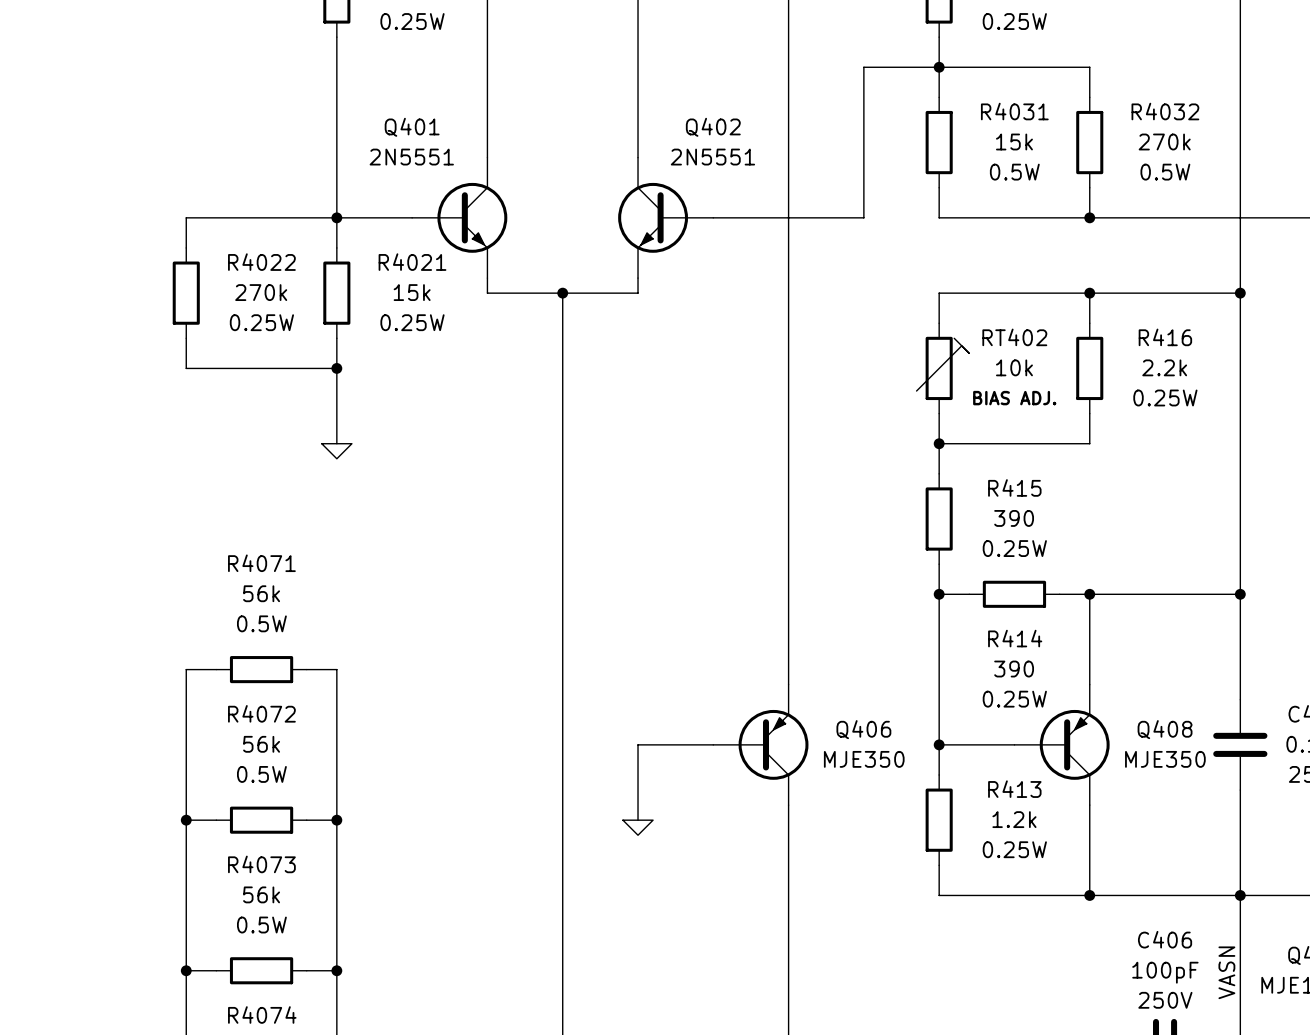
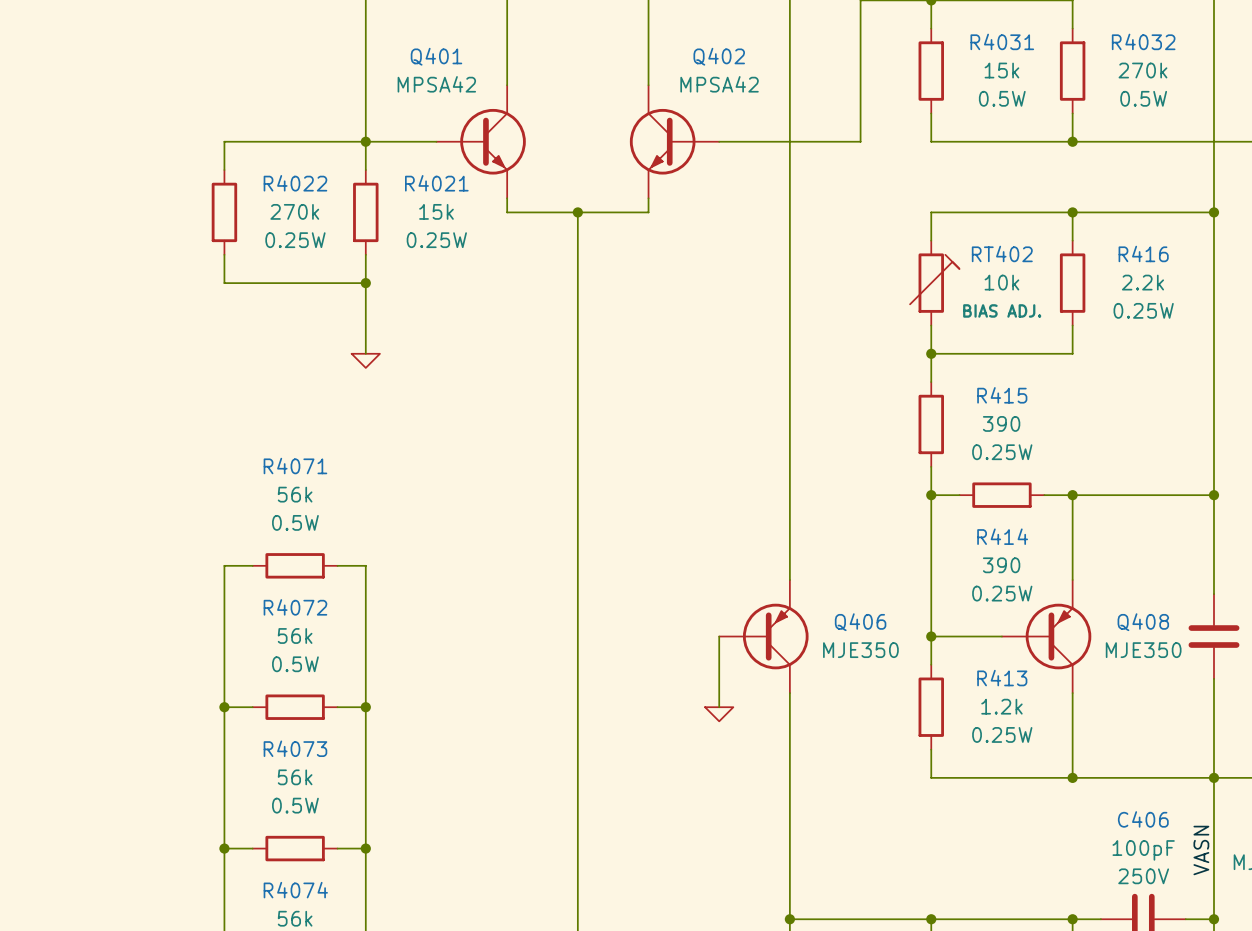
Q401 value: 2N5551 (411, 157) -> MPSA42 (436, 84)
Q402 value: 2N5551 (712, 157) -> MPSA42 (719, 84)
wire: (713, 744) (638, 744) (638, 820) -> (719, 636) (719, 707)
power symbol position: (638, 827) -> (719, 714)

